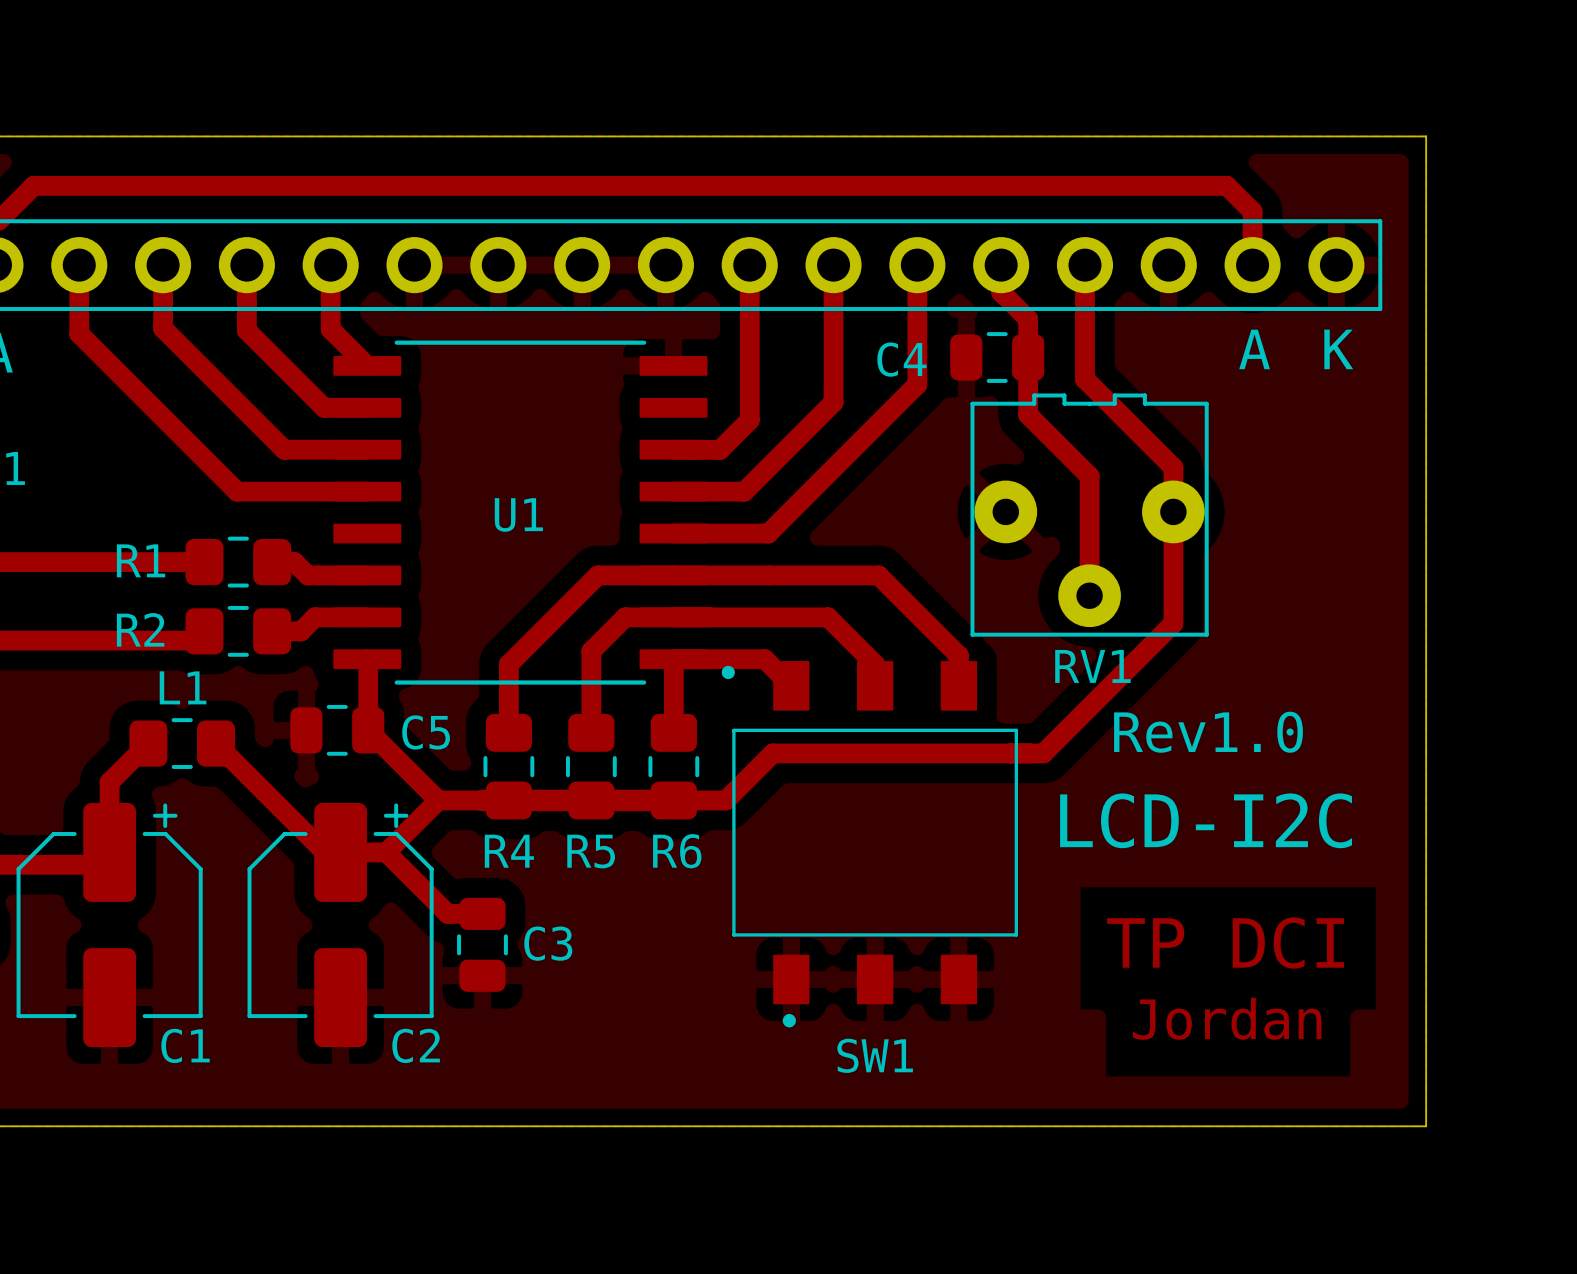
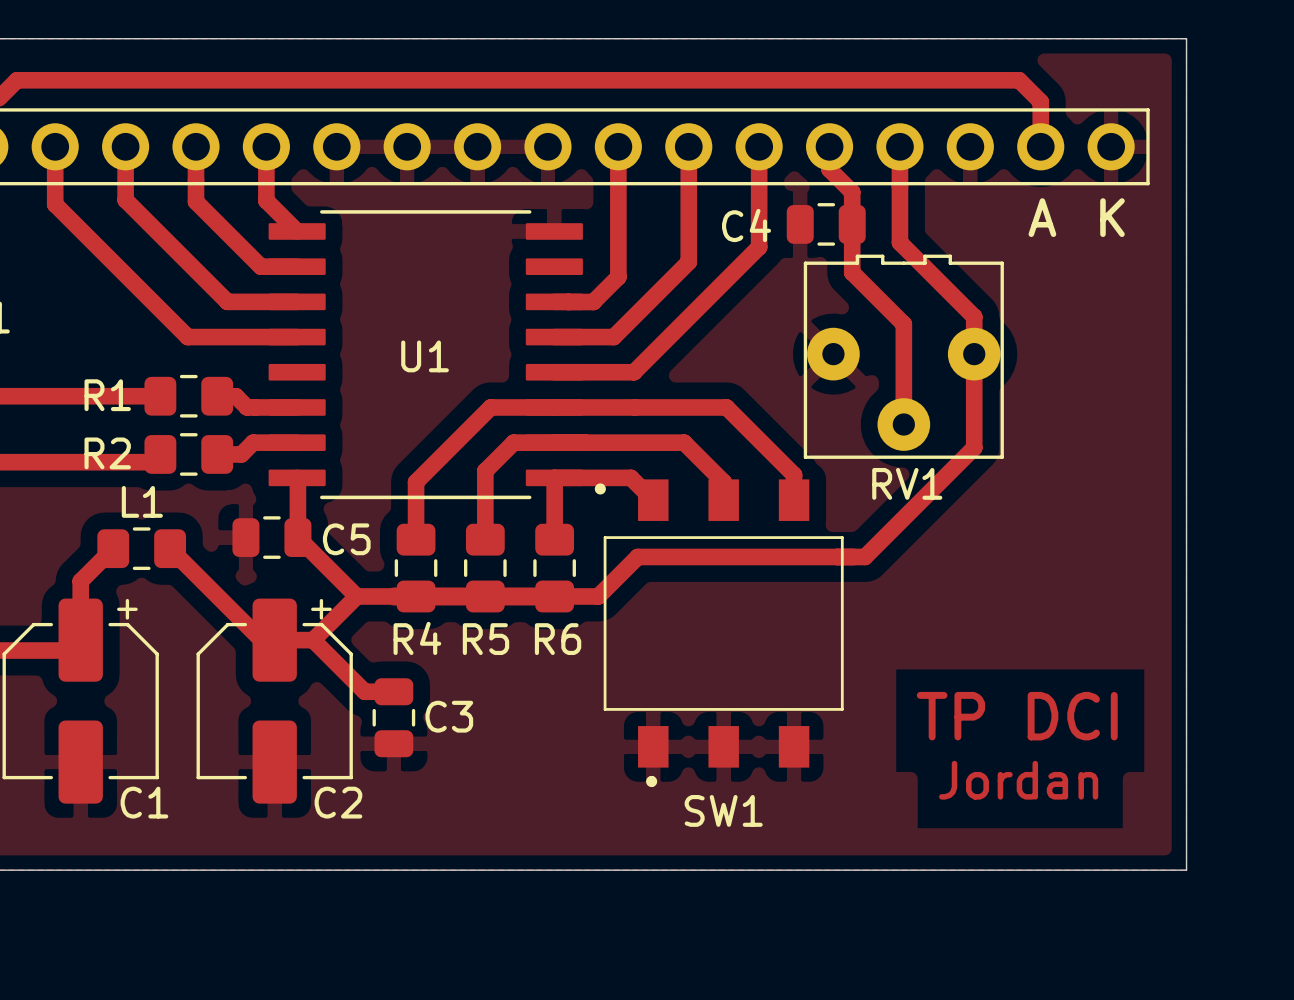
text: Rev1.0 (1208, 732) -> none
text: LCD-I2C (1206, 820) -> none

